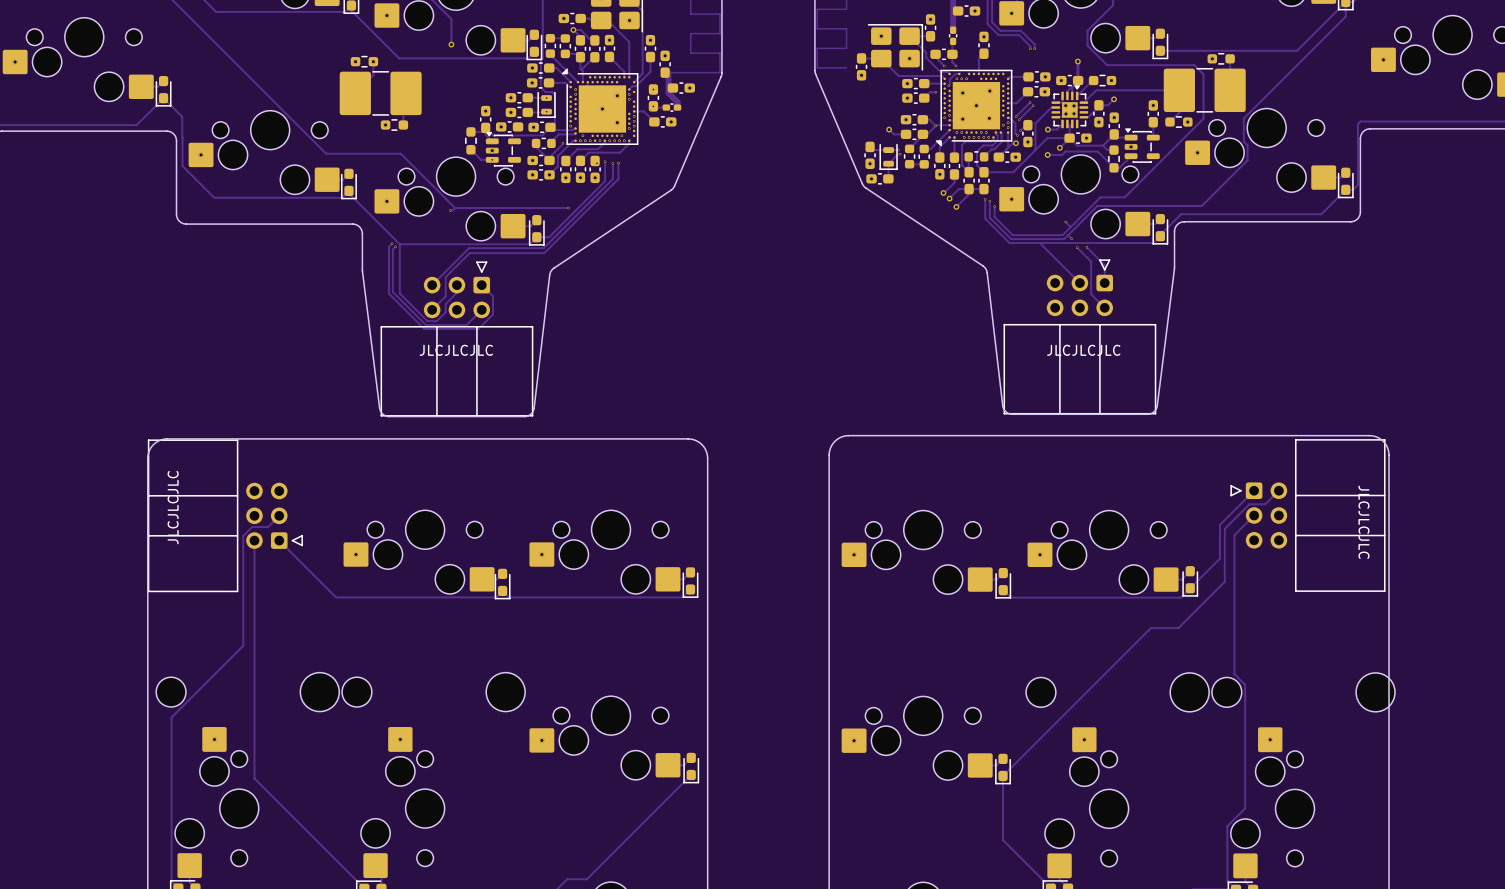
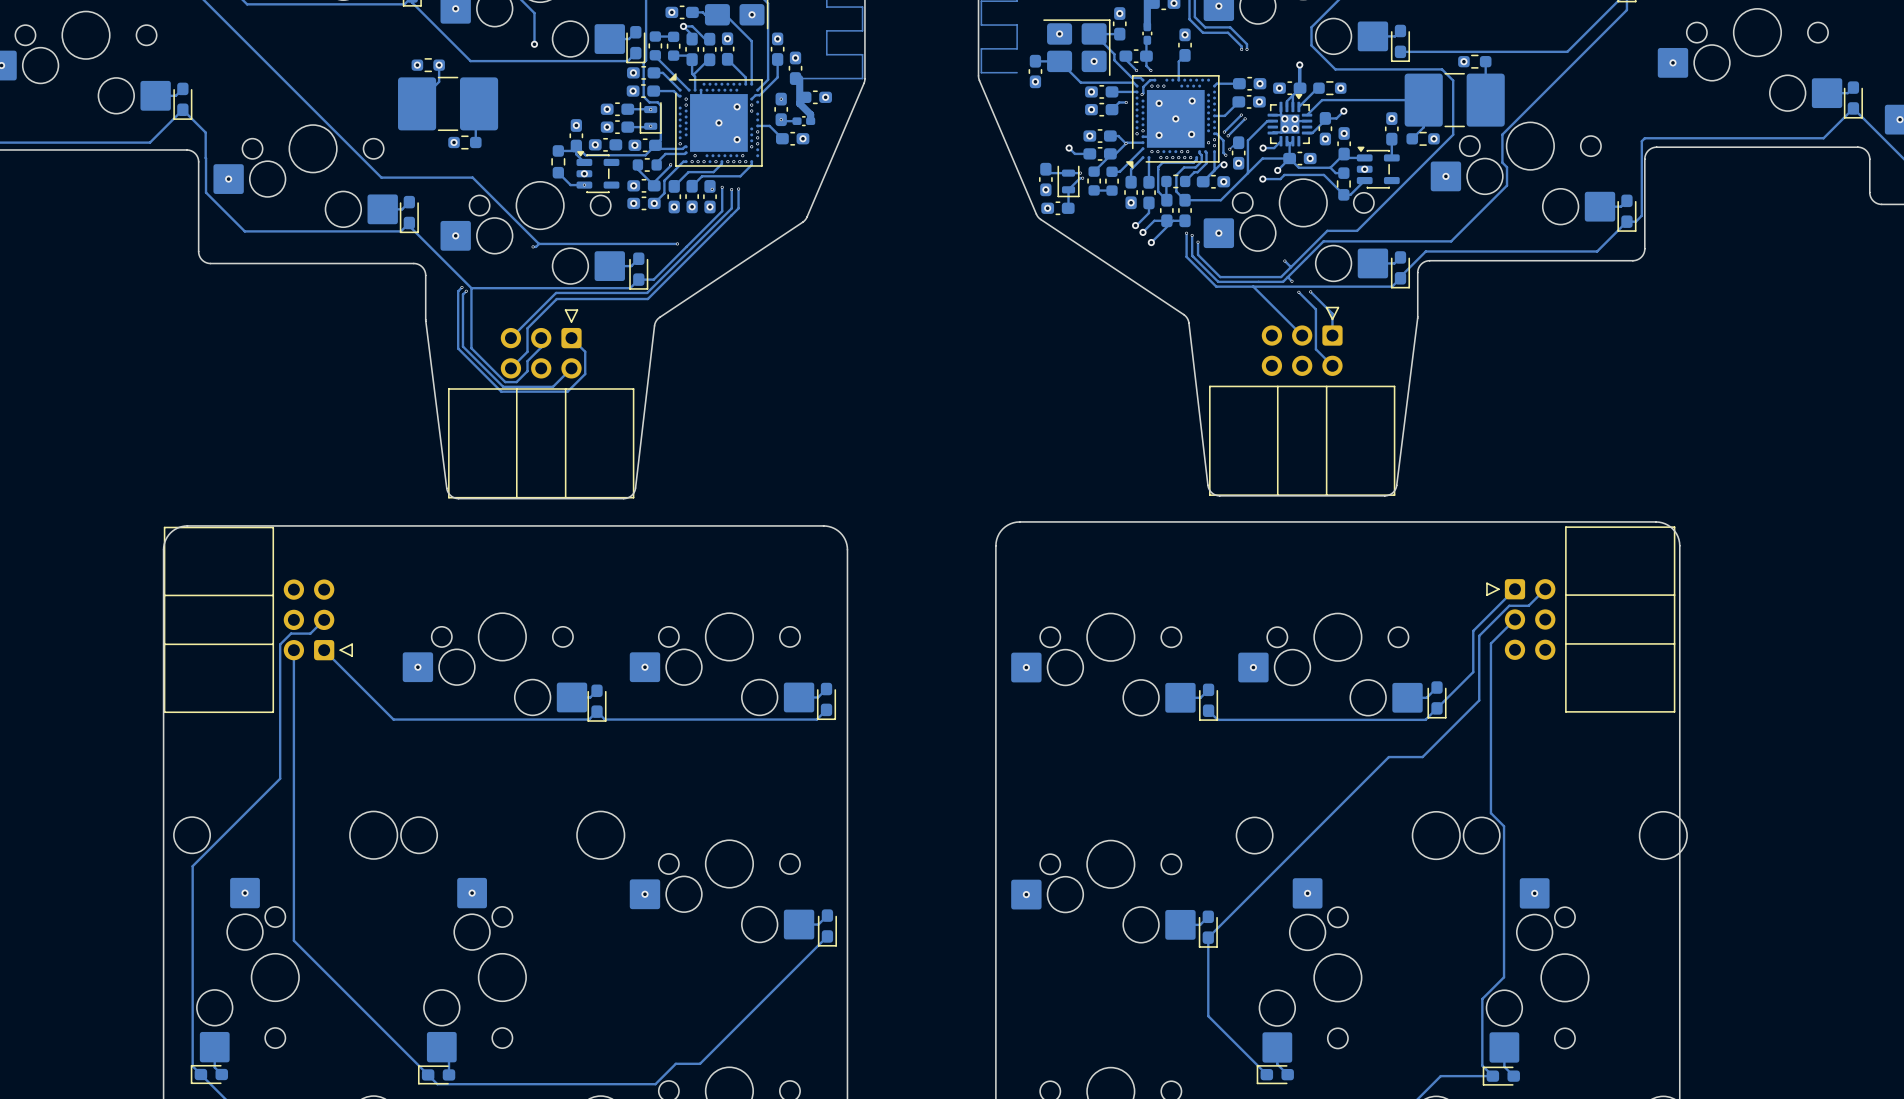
text: JLCJLCJLC (456, 350) -> none
text: JLCJLCJLC (1083, 350) -> none
text: JLCJLCJLC (173, 507) -> none
text: JLCJLCJLC (1364, 522) -> none

